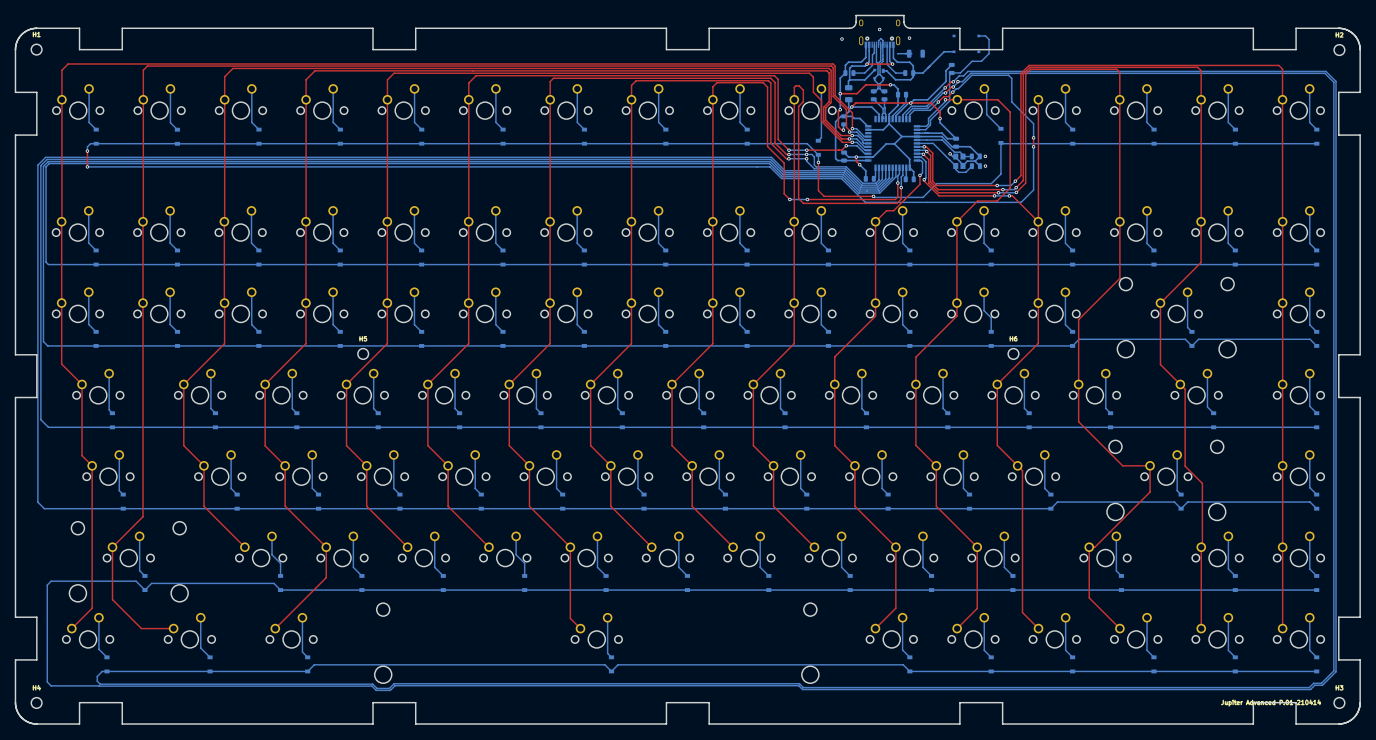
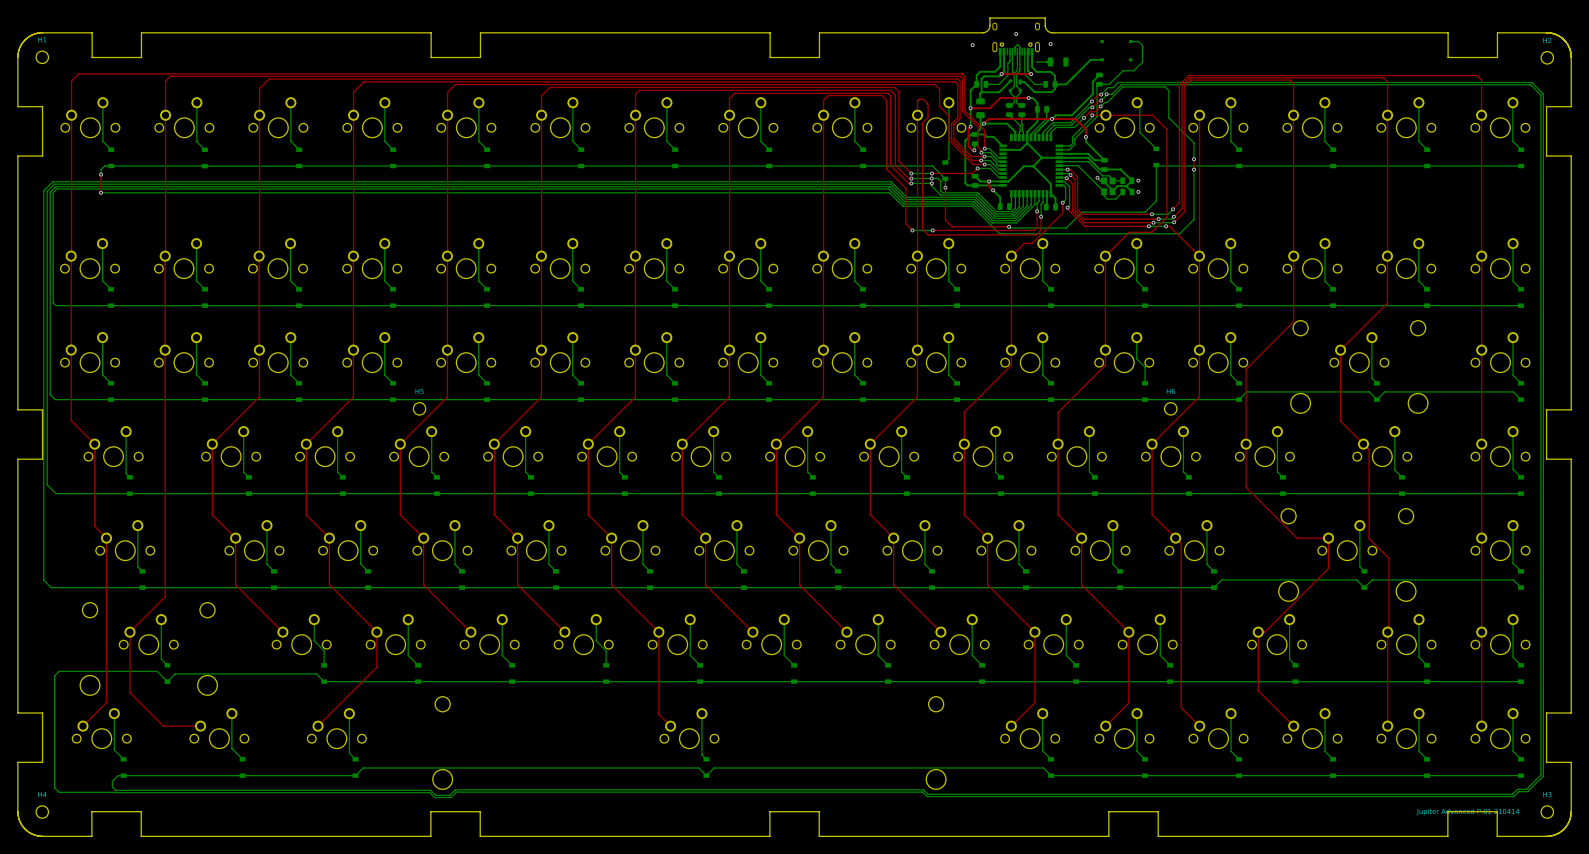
board edge: (36, 28) (79, 28) (79, 49) (122, 49) (122, 28) (372, 28) (372, 49) (415, 49) (415, 28) (666, 28) (666, 49) (709, 49) (709, 28) (850, 28) (855, 24) (856, 15) (903, 15) (904, 24) (908, 28) (959, 28) (959, 49) (1002, 49) (1002, 28) (1253, 28) (1253, 49) (1296, 49) (1296, 28) (1338, 28) -> none
board edge: none -> (42, 32) (92, 32) (92, 57) (141, 57) (141, 32) (431, 32) (431, 57) (480, 57) (480, 32) (770, 32) (770, 57) (819, 57) (819, 32) (983, 32) (989, 28) (989, 18) (1045, 18) (1046, 29) (1052, 32) (1448, 32) (1448, 57) (1497, 57) (1497, 32) (1549, 32) (1564, 40) (1570, 49) (1571, 57)

